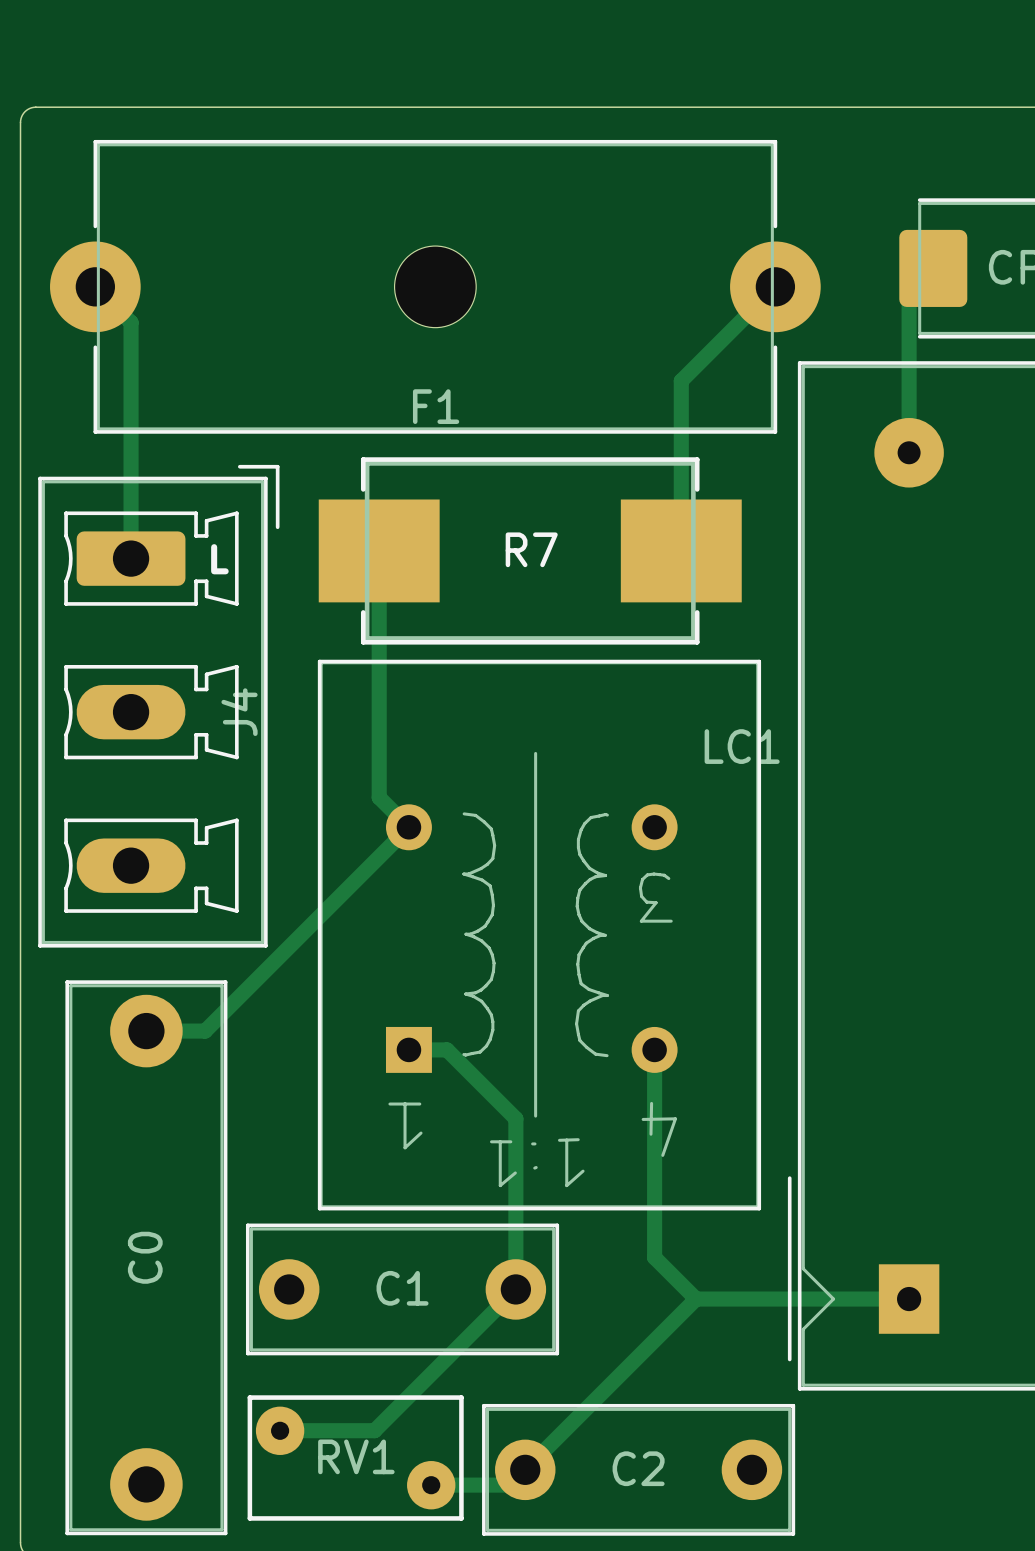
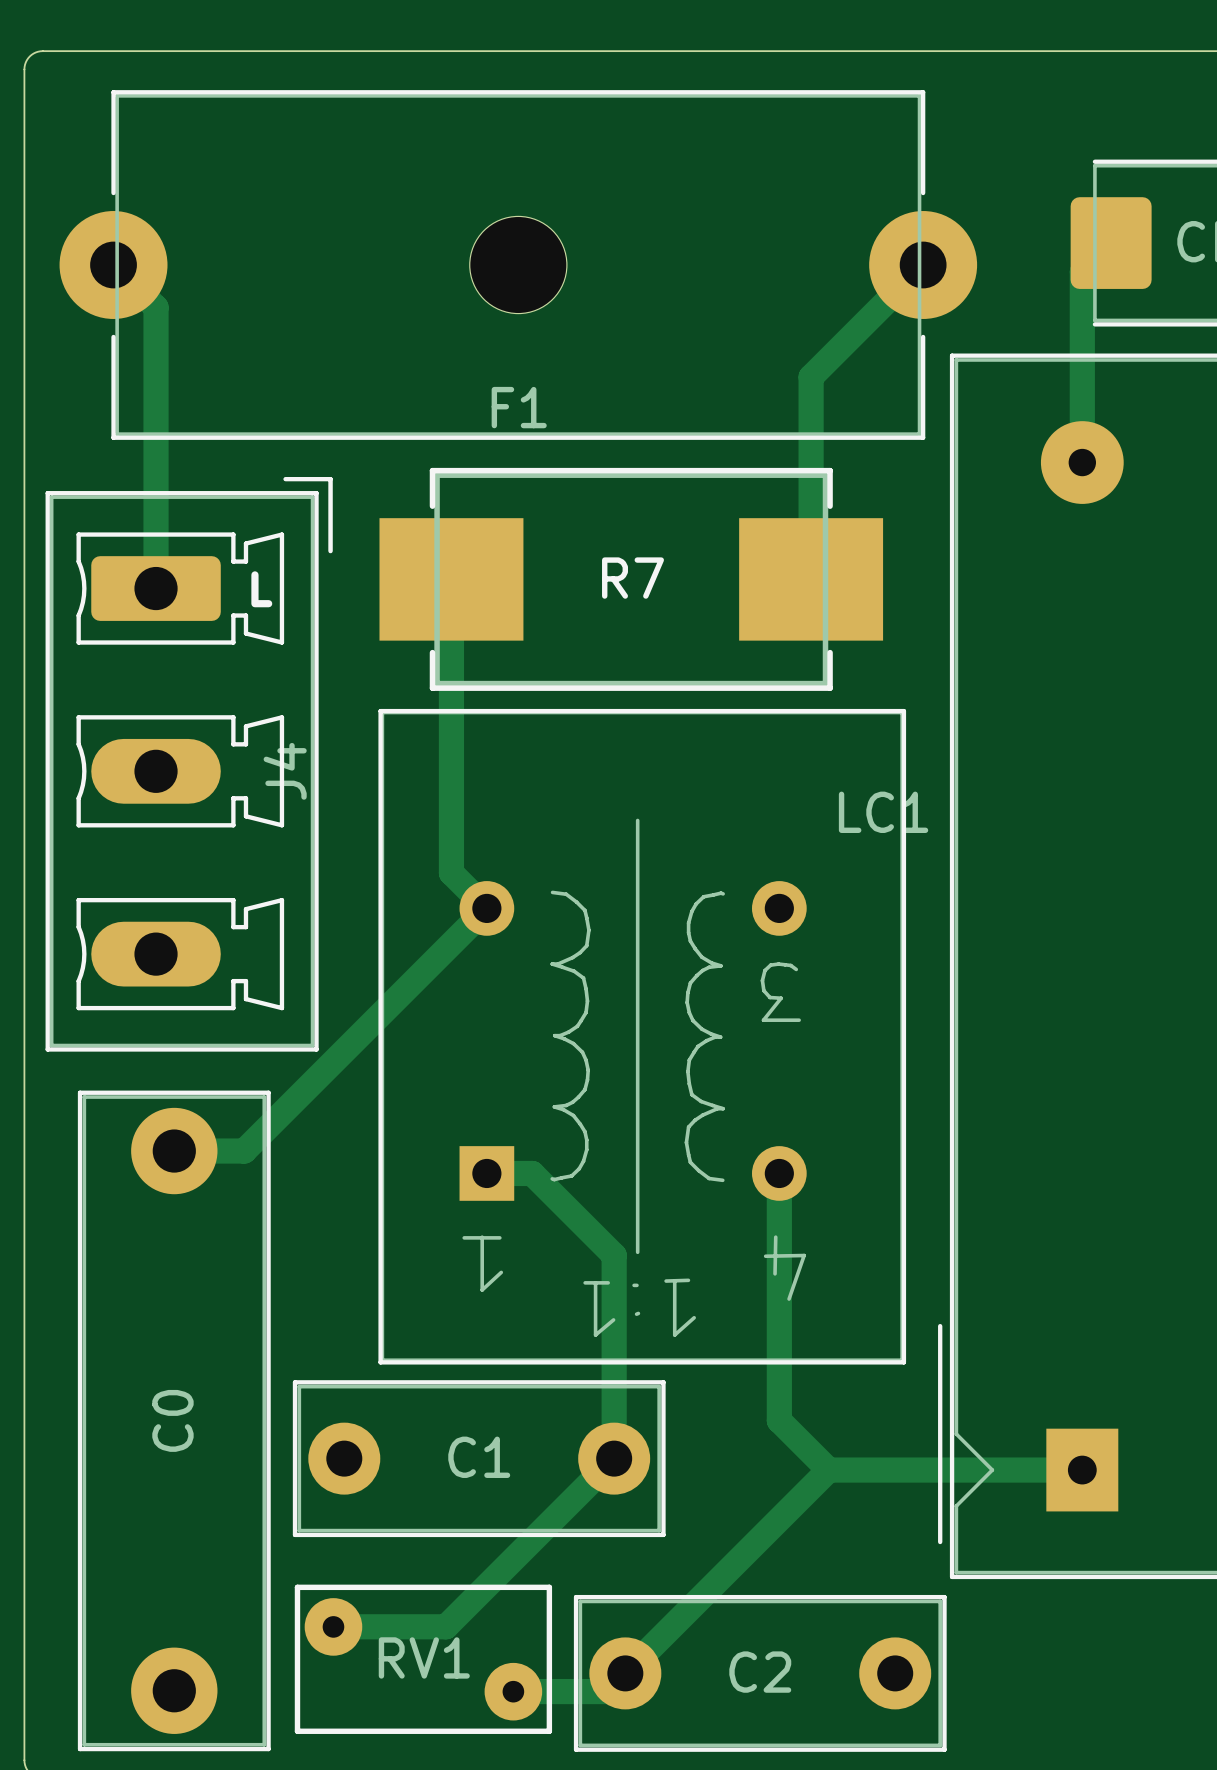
track width: thin (933, 268) (909, 292) (909, 452) -> thick (1111, 243) (1082, 271) (1082, 462)
track width: thin (95, 286) (131, 322) (131, 558) -> thick (113, 265) (156, 307) (156, 588)
track width: thin (775, 286) (681, 380) (681, 550) -> thick (923, 265) (811, 377) (811, 579)
track width: thin (379, 550) (379, 797) (408, 827) (205, 1031) (146, 1031) -> thick (451, 579) (451, 873) (486, 908) (244, 1151) (174, 1151)
track width: thin (408, 1049) (447, 1049) (515, 1118) (515, 1289) (374, 1430) (279, 1430) -> thick (486, 1173) (532, 1173) (614, 1255) (614, 1458) (446, 1626) (333, 1626)
track width: thin (654, 1049) (654, 1257) (696, 1299) -> thick (779, 1173) (779, 1420) (828, 1470)
track width: thin (696, 1299) (510, 1485) (431, 1485) -> thick (828, 1470) (607, 1691) (513, 1691)
track width: thin (696, 1299) (909, 1299) -> thick (828, 1470) (1082, 1470)

